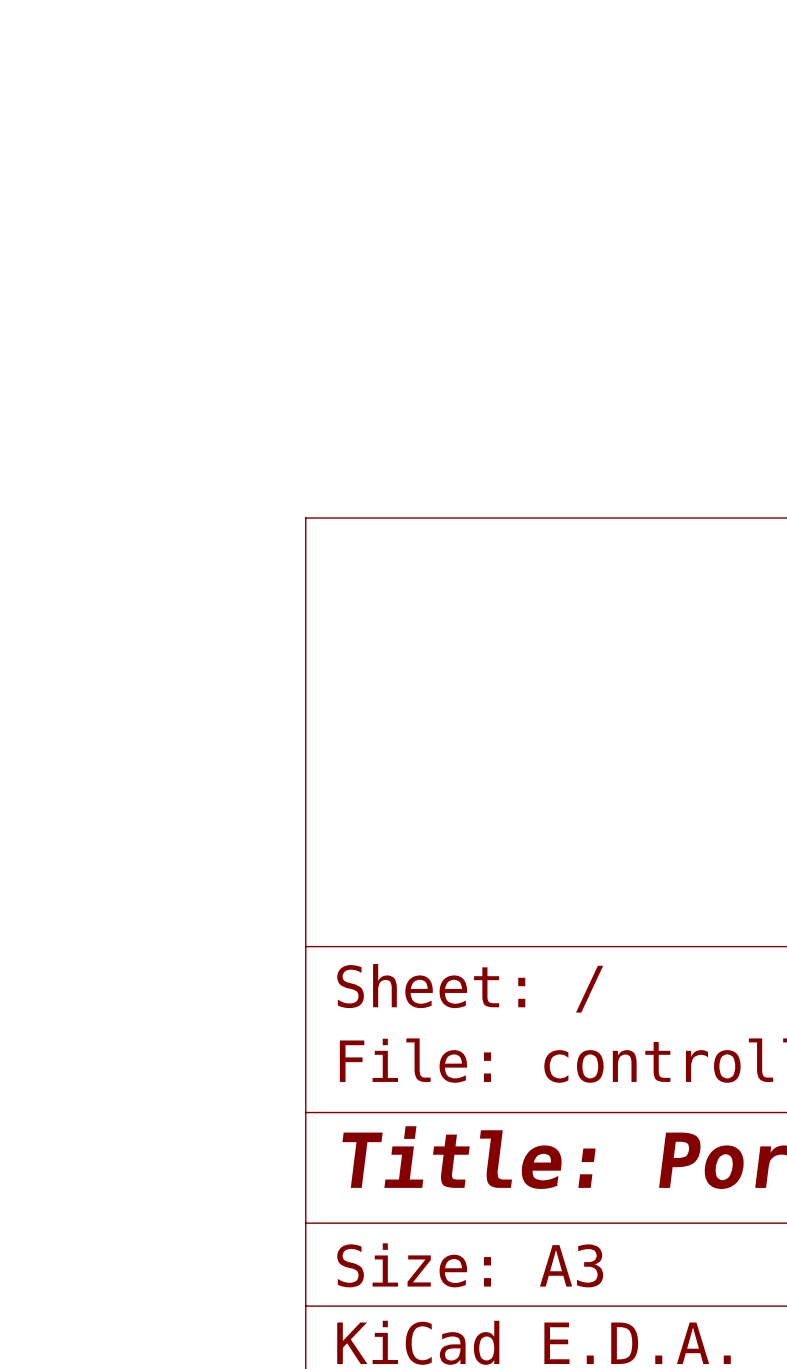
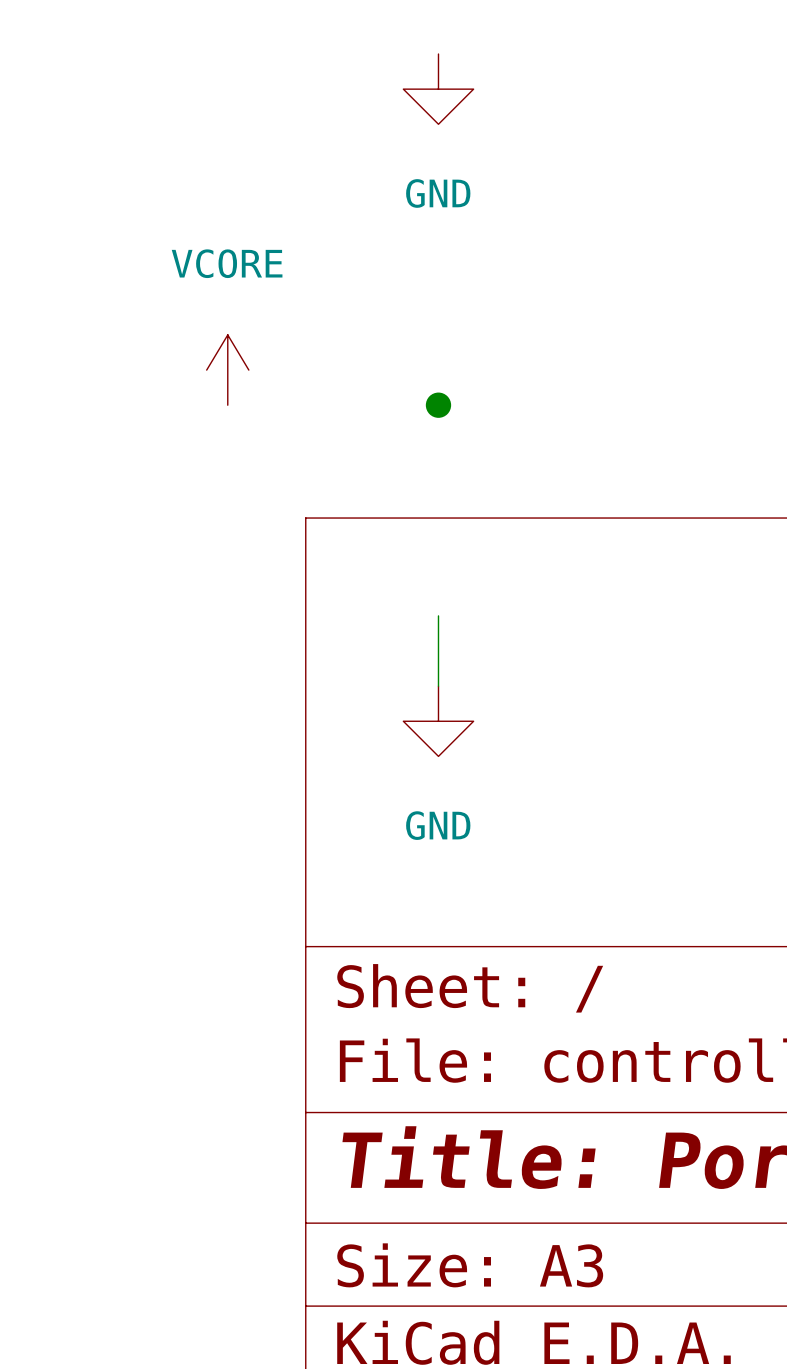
power symbol: none -> GND (438, 89)
power symbol: none -> VCORE (227, 370)
junction: none -> (438, 405)
wire: none -> (438, 615) (438, 686)
power symbol: none -> GND (438, 721)

